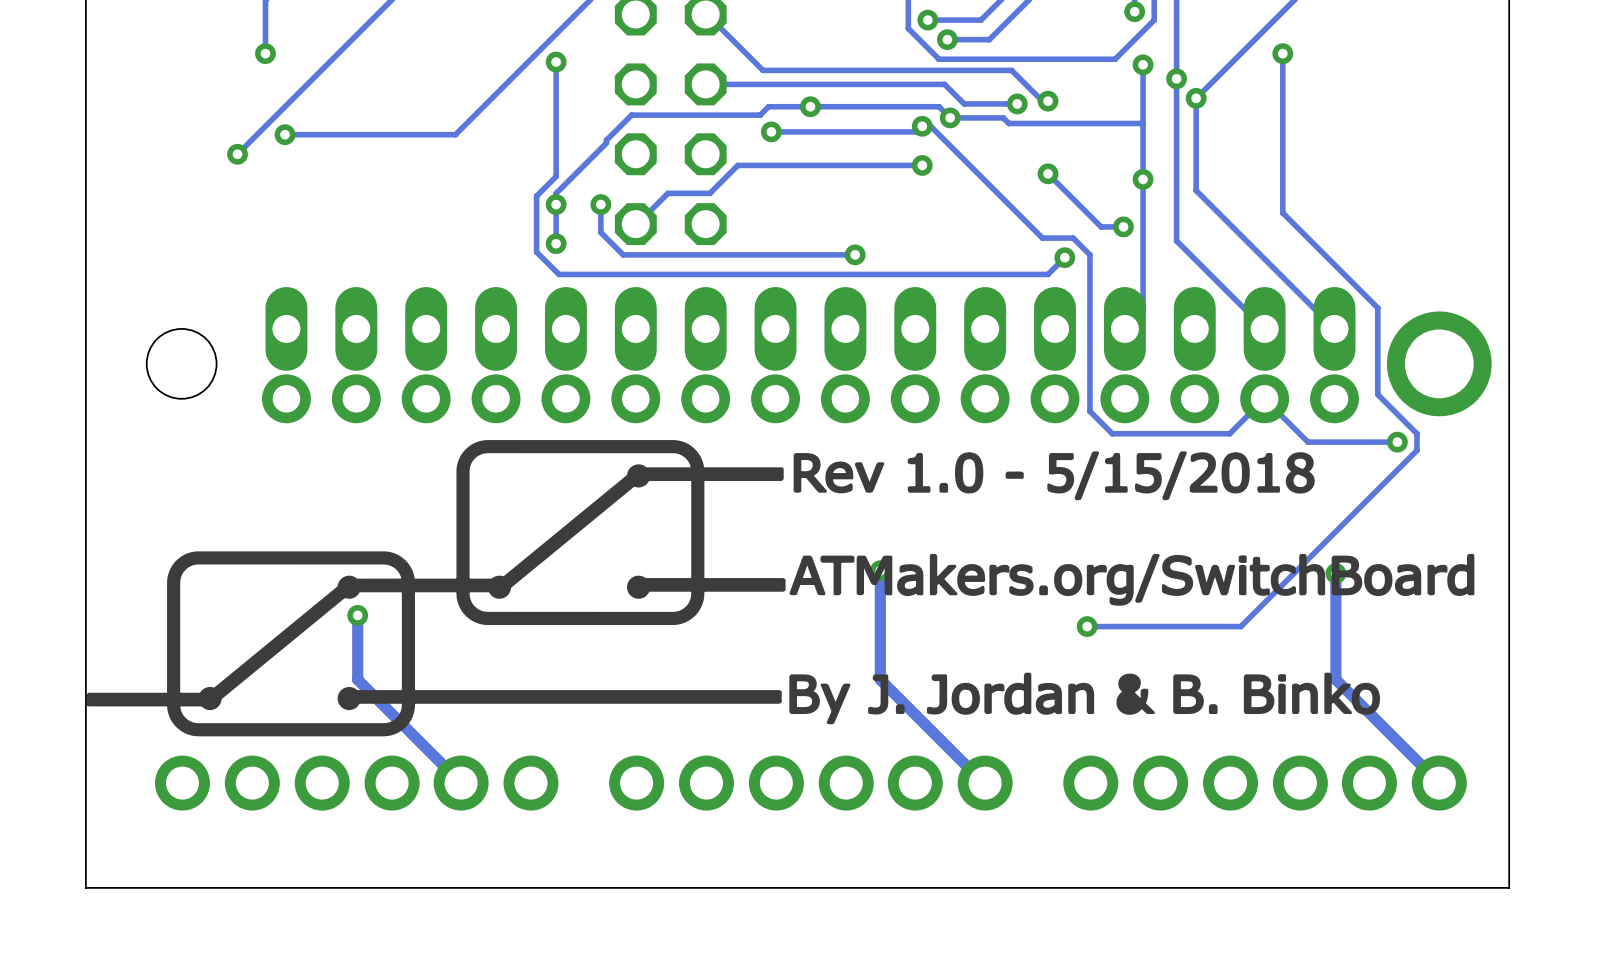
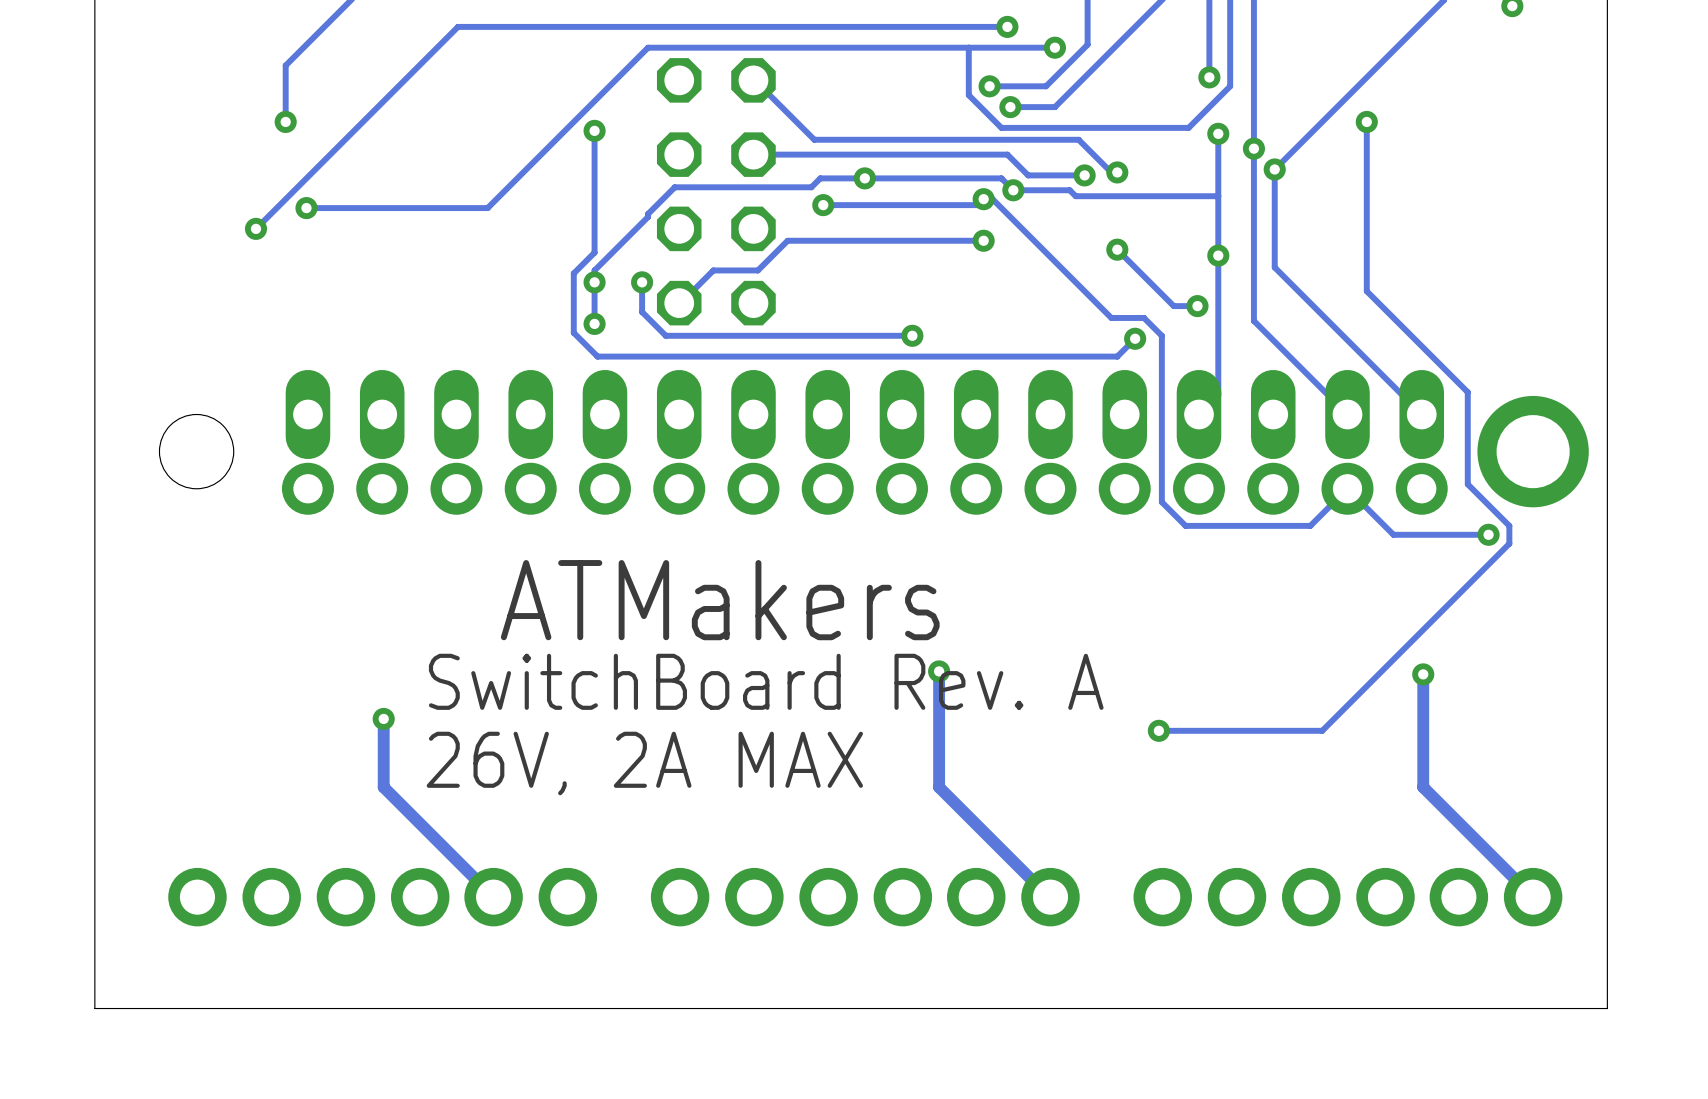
drawing: [86, 440, 1475, 737] -> none
text: none -> ATMakers (720, 600)
text: none -> SwitchBoard Rev. A (766, 681)
text: none -> 26V, 2A MAX (644, 763)

